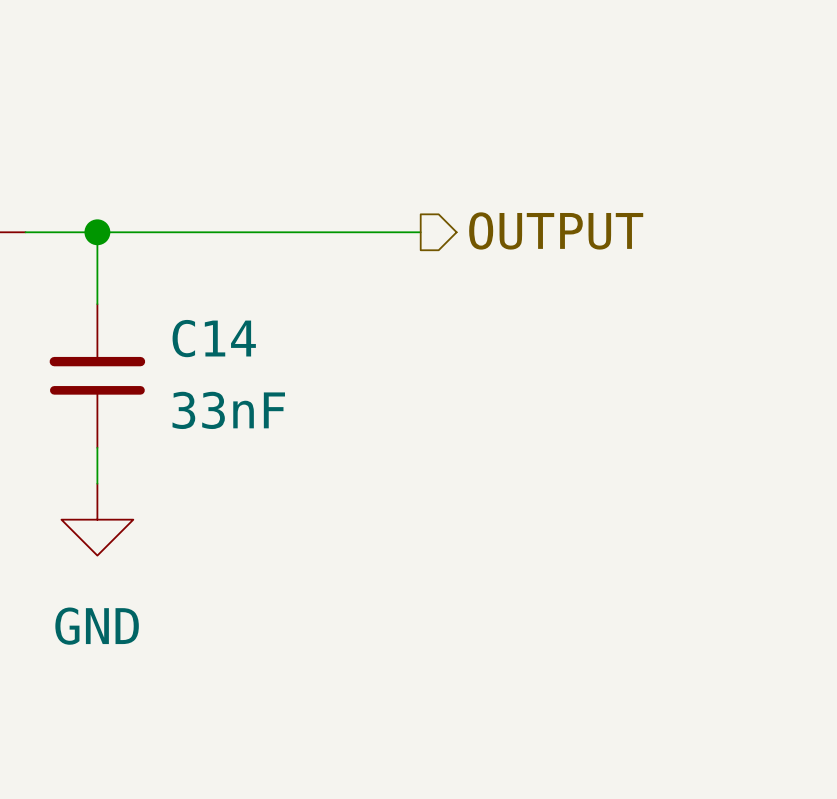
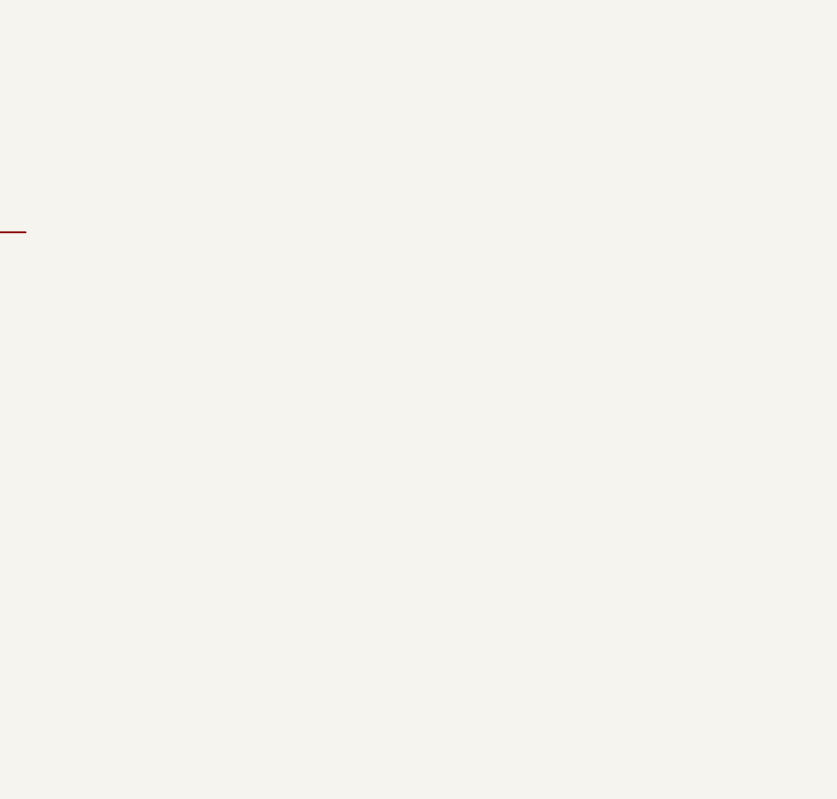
hierarchical label: OUTPUT (556, 230) -> none
wire: (25, 232) (420, 232) -> none
wire: (97, 232) (97, 304) -> none
junction: (97, 232) -> none
C14: 33nF (97, 375) -> none
wire: (97, 447) (97, 483) -> none
power symbol: GND (97, 519) -> none

